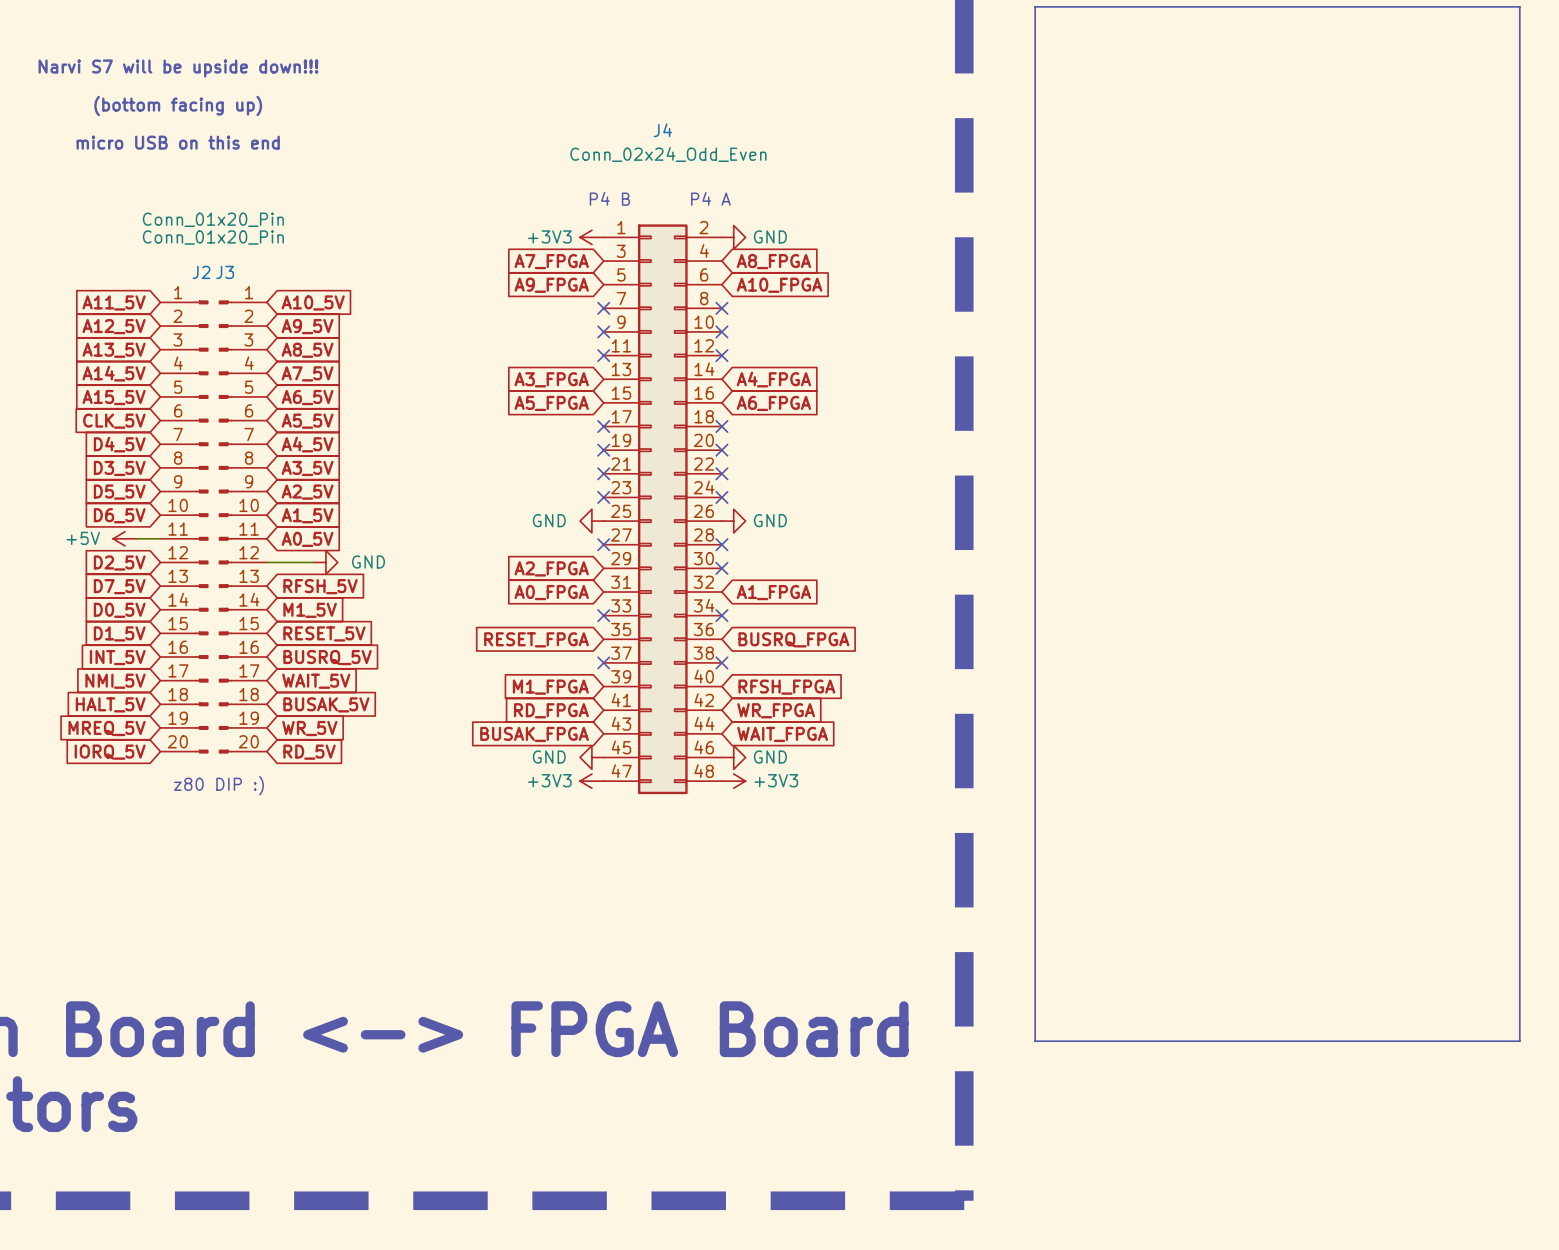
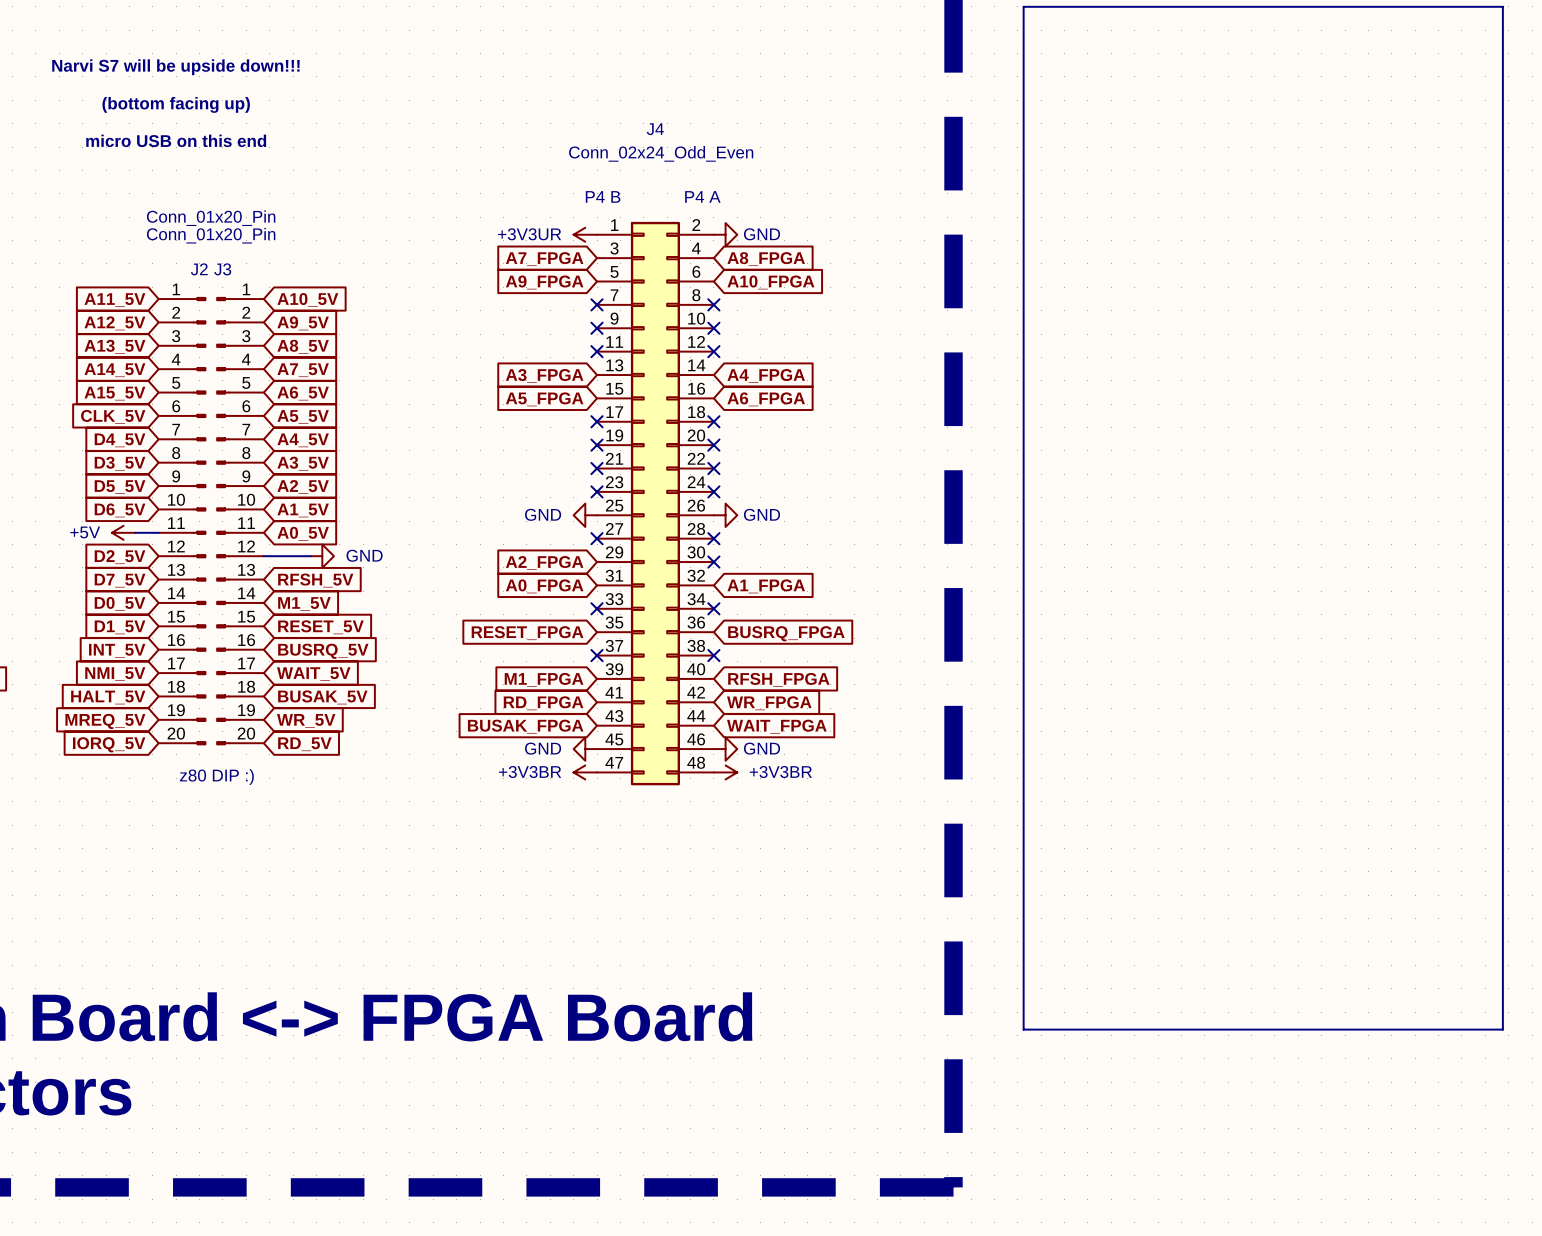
power symbol: +3V3 (591, 237) -> +3V3UR (585, 234)
power symbol: +3V3 (591, 781) -> +3V3BR (585, 772)
power symbol: +3V3 (733, 781) -> +3V3BR (725, 772)

